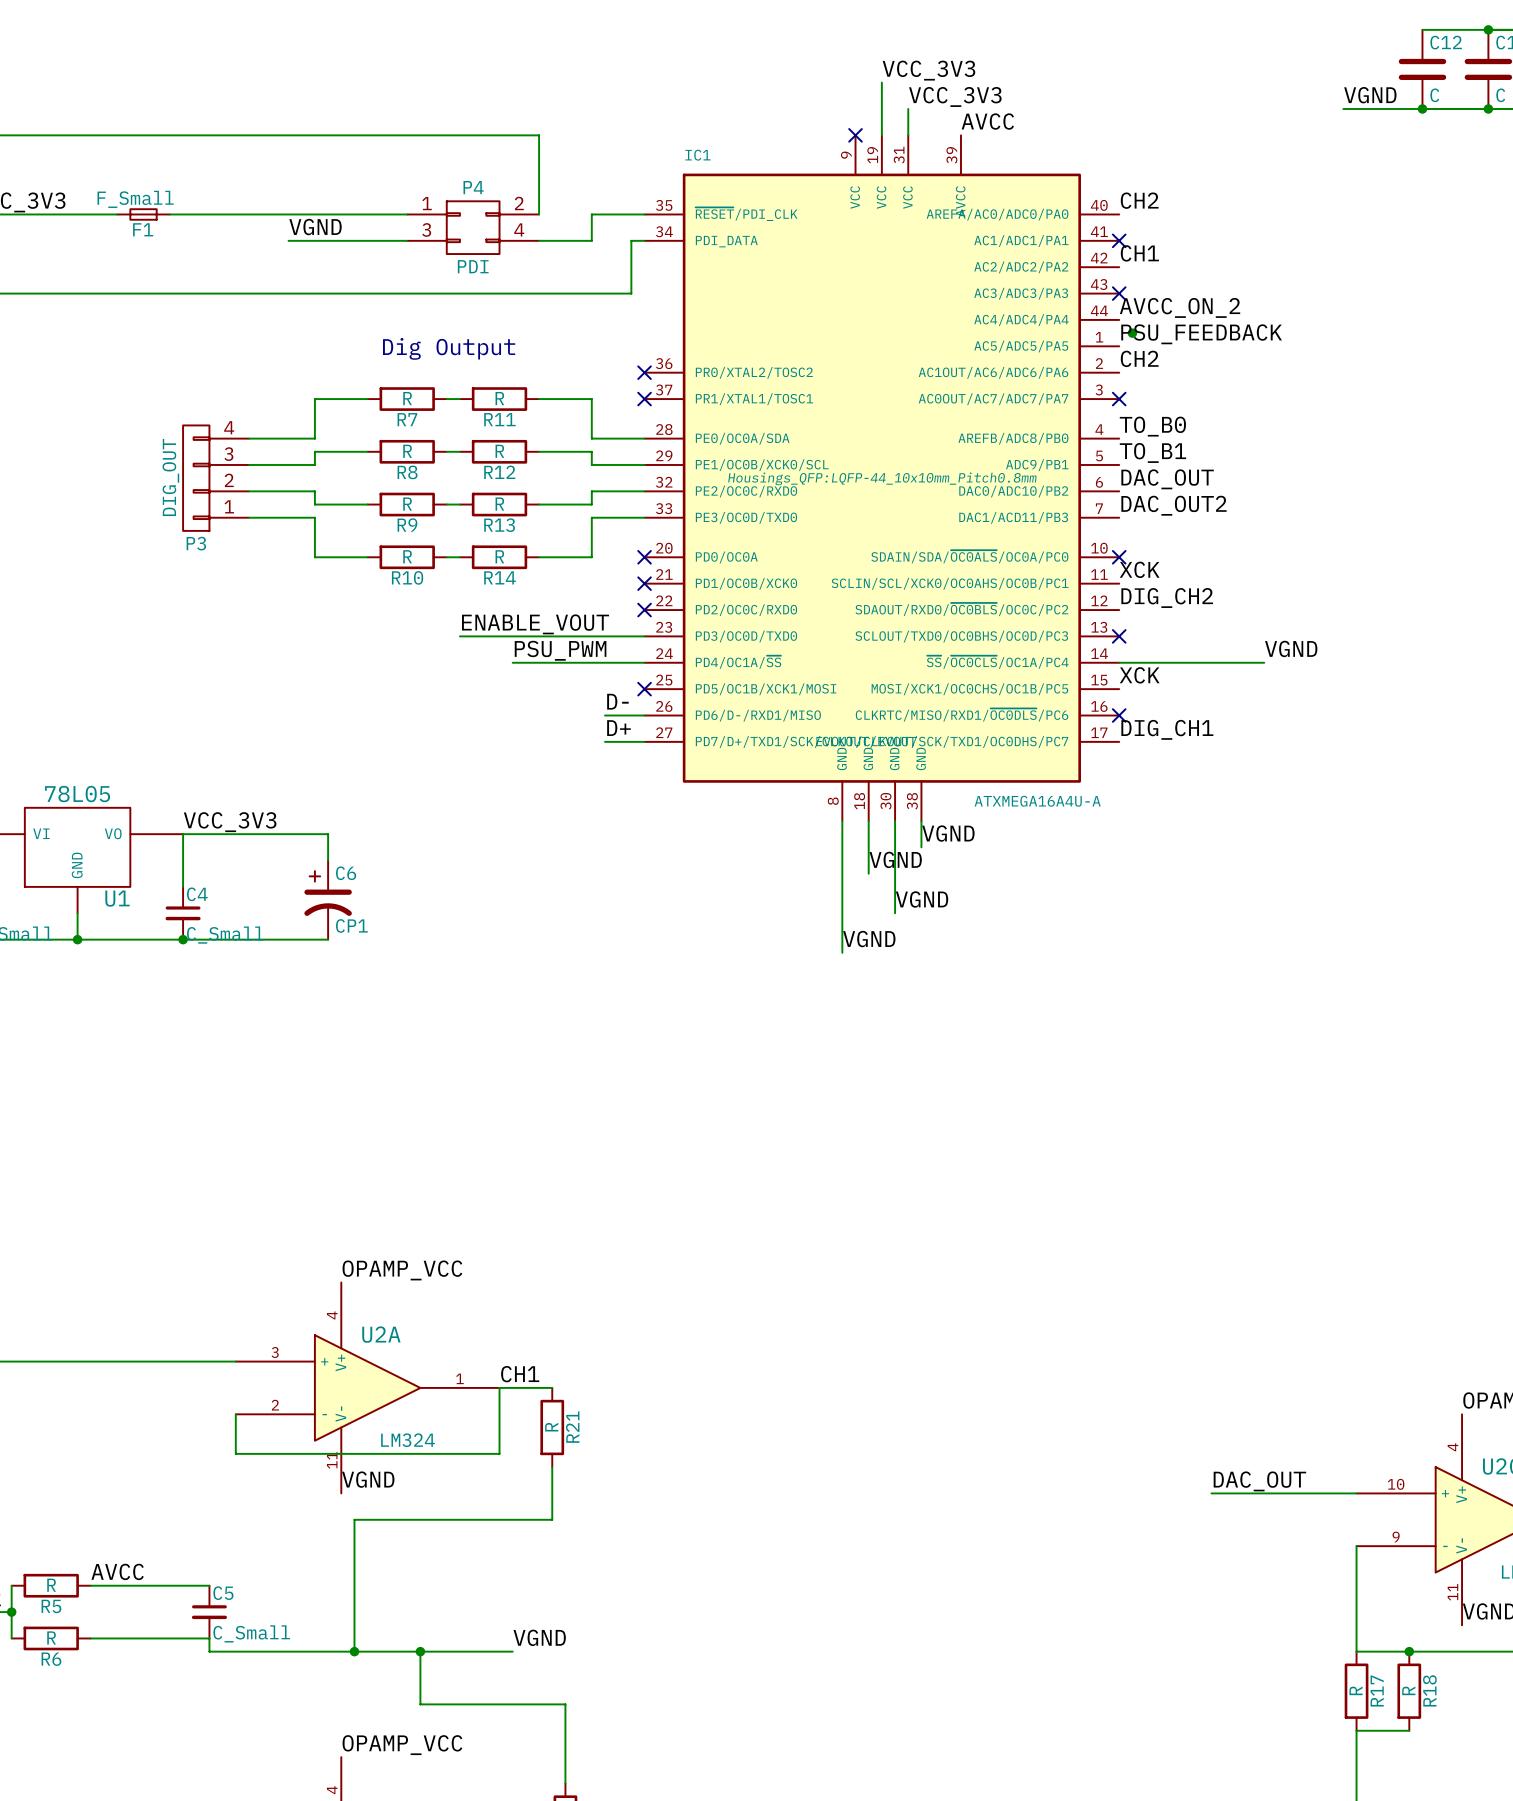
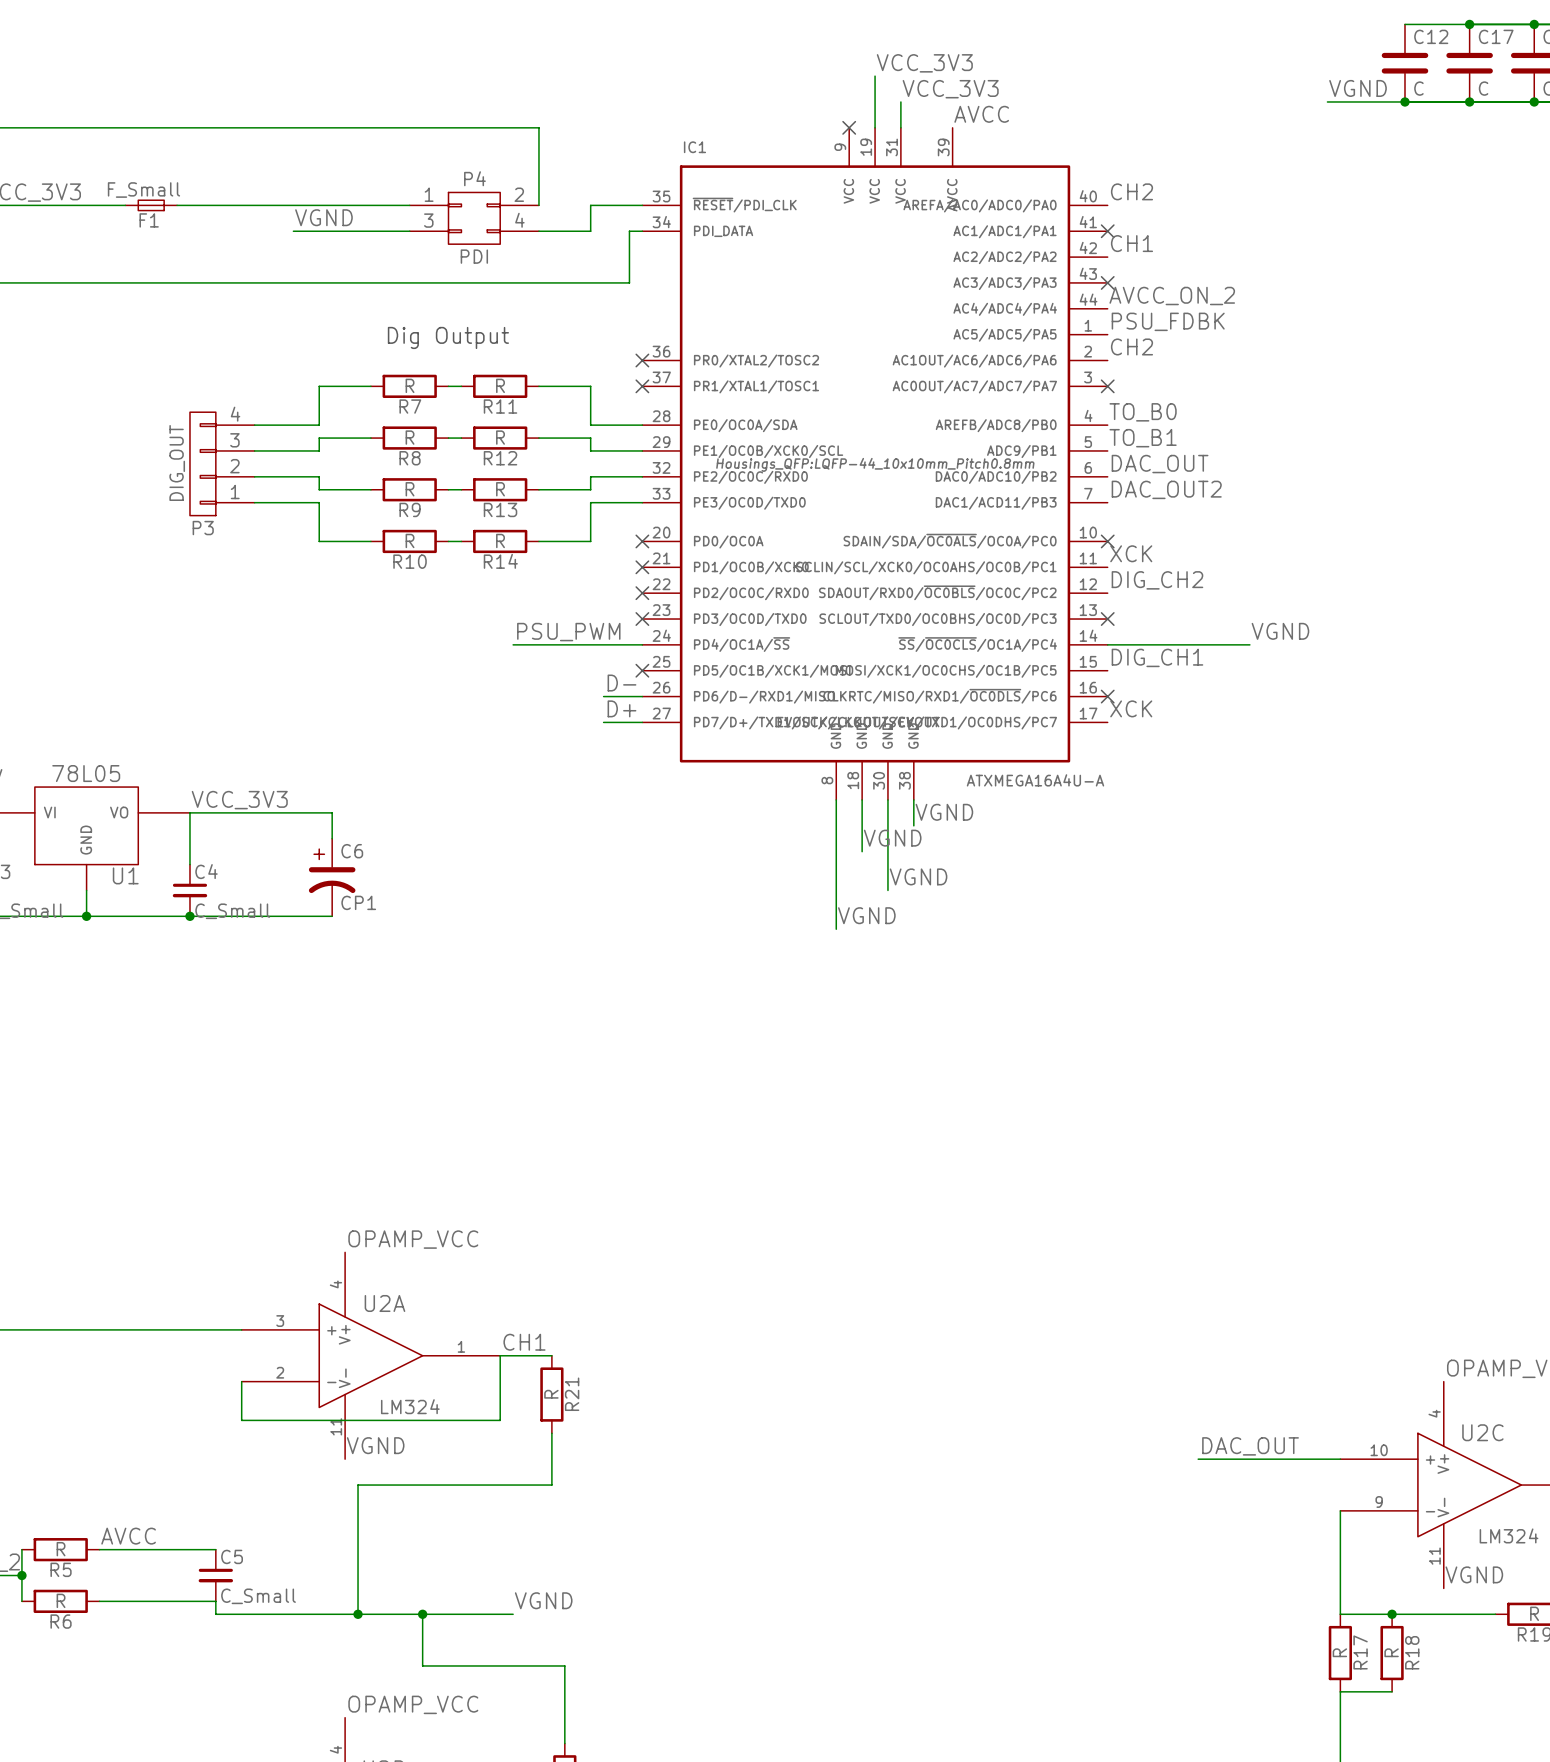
junction: (1132, 333) -> none
label: PSU_FEEDBACK (1201, 334) -> PSU_FDBK (1168, 321)
label: ENABLE_VOUT (535, 624) -> none
wire: (459, 636) (644, 636) -> none
no-connect mark: none -> (642, 619)
label: XCK (1139, 675) -> DIG_CH1 (1157, 657)
label: DIG_CH1 (1167, 729) -> XCK (1131, 708)

